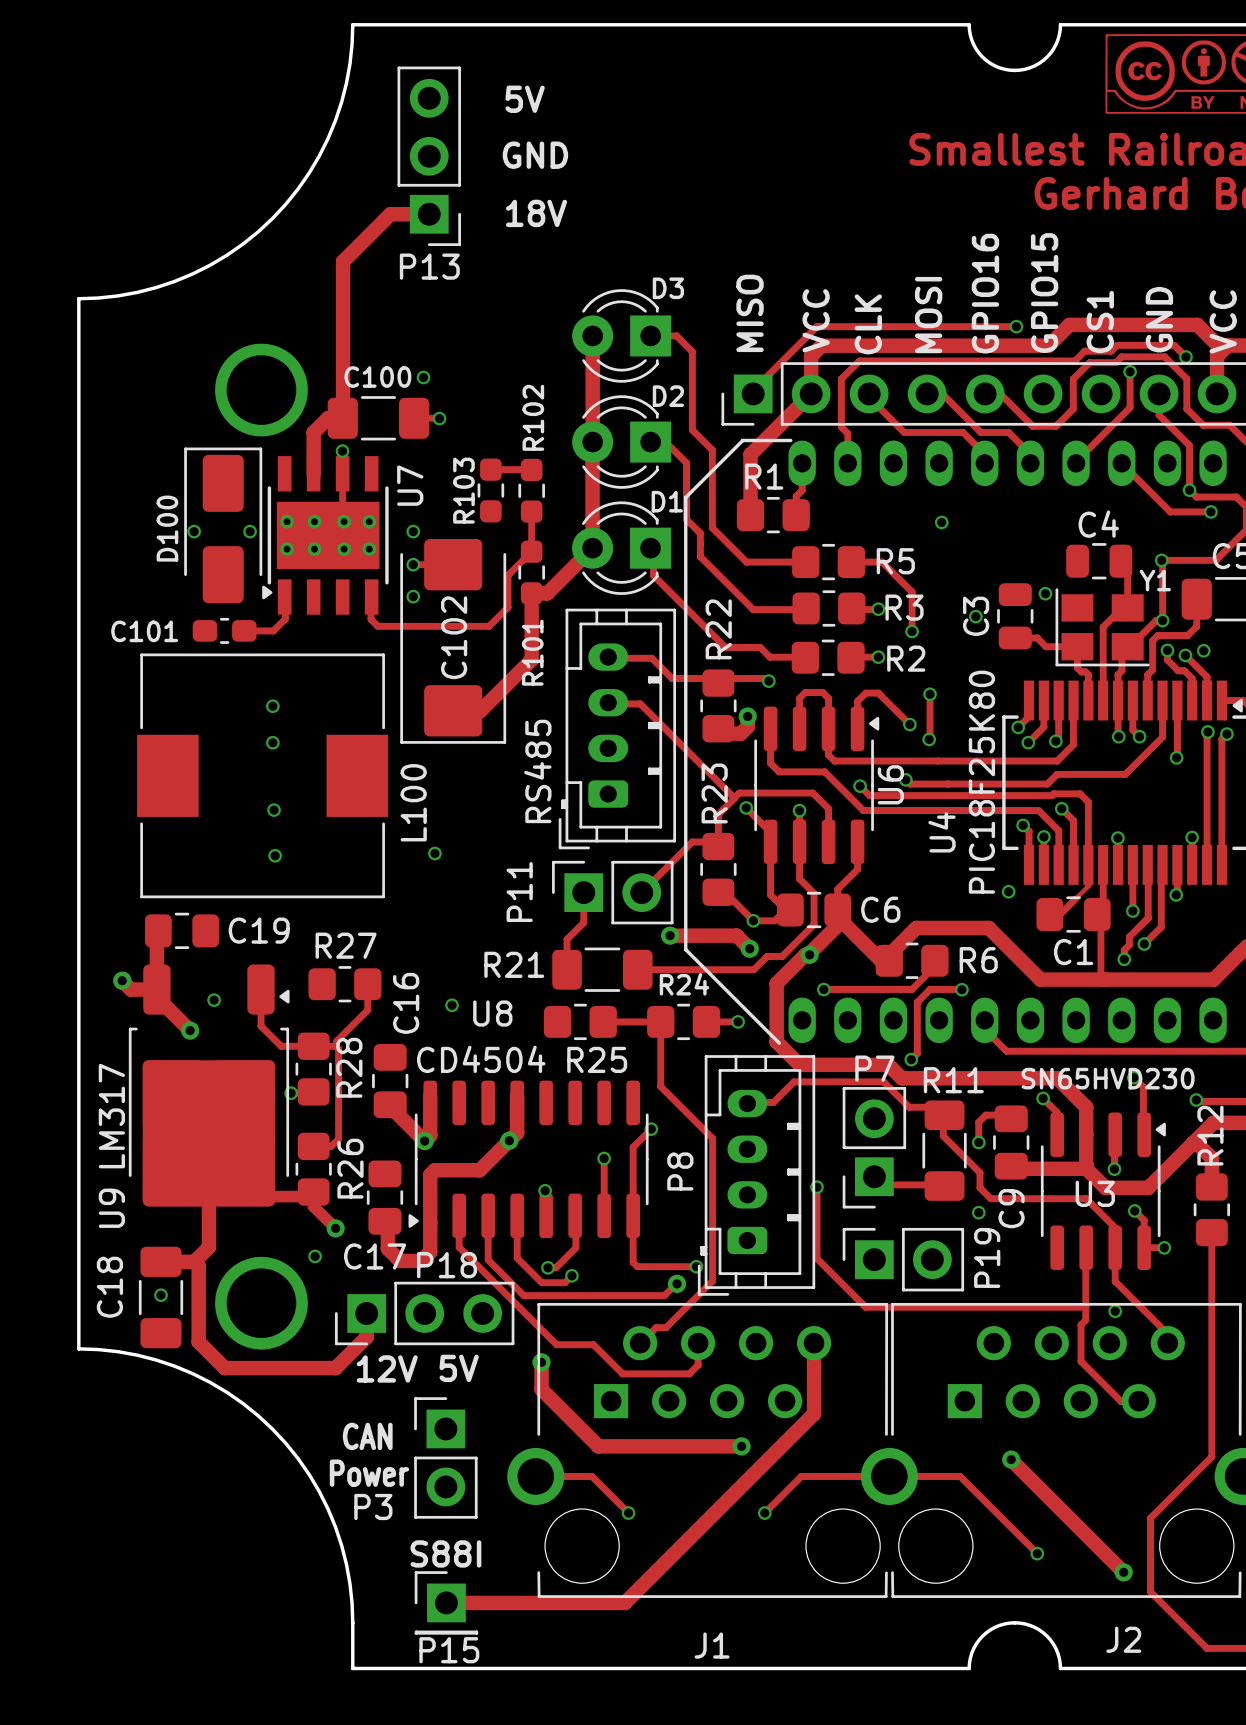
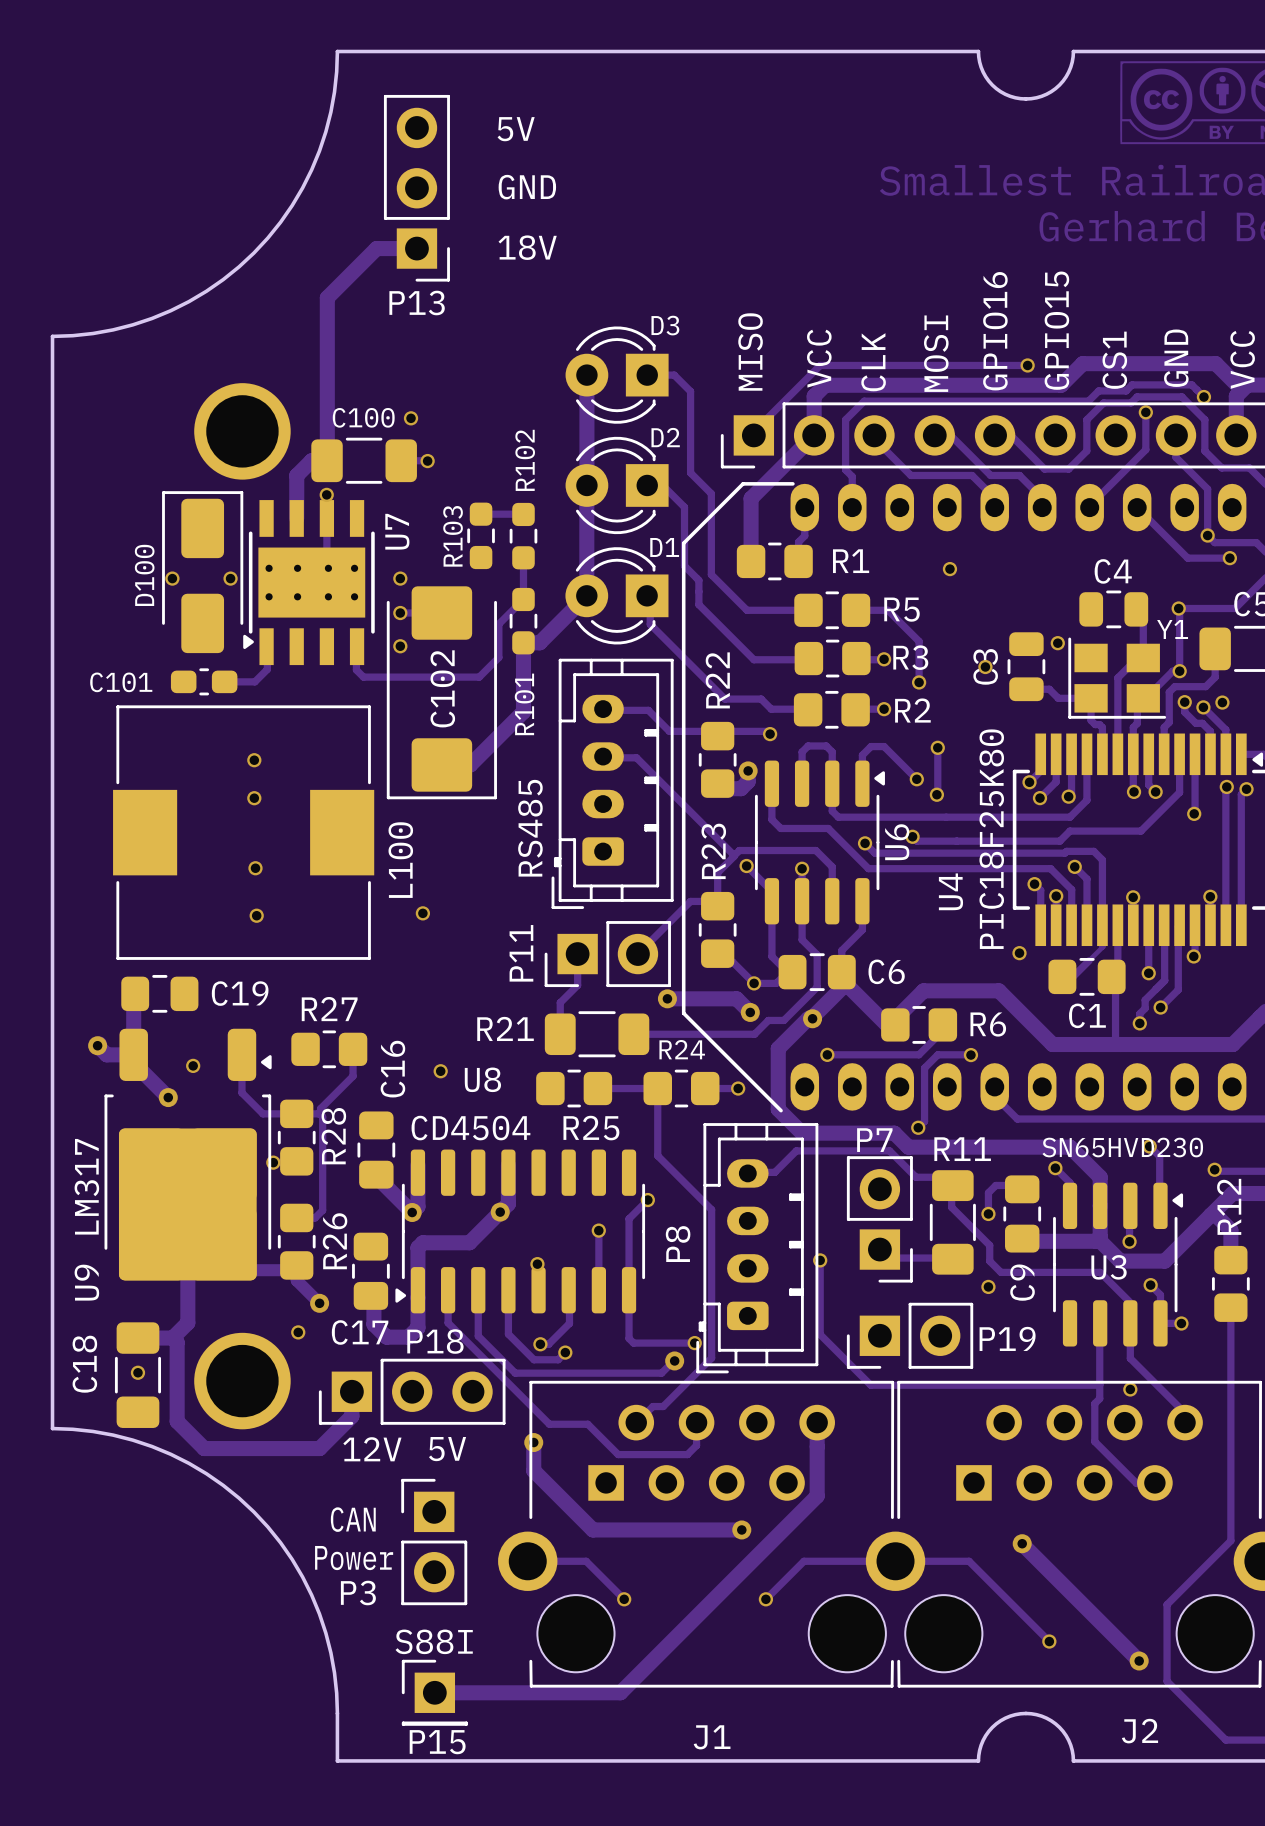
R1 name position: R1 (764, 476) -> R1 (851, 561)
P11 footprint: [552, 860, 674, 925] -> [544, 921, 671, 988]
P7 footprint: [842, 1087, 907, 1209] -> [846, 1156, 913, 1283]
P19 footprint: [842, 1227, 965, 1292] -> [846, 1302, 974, 1369]

